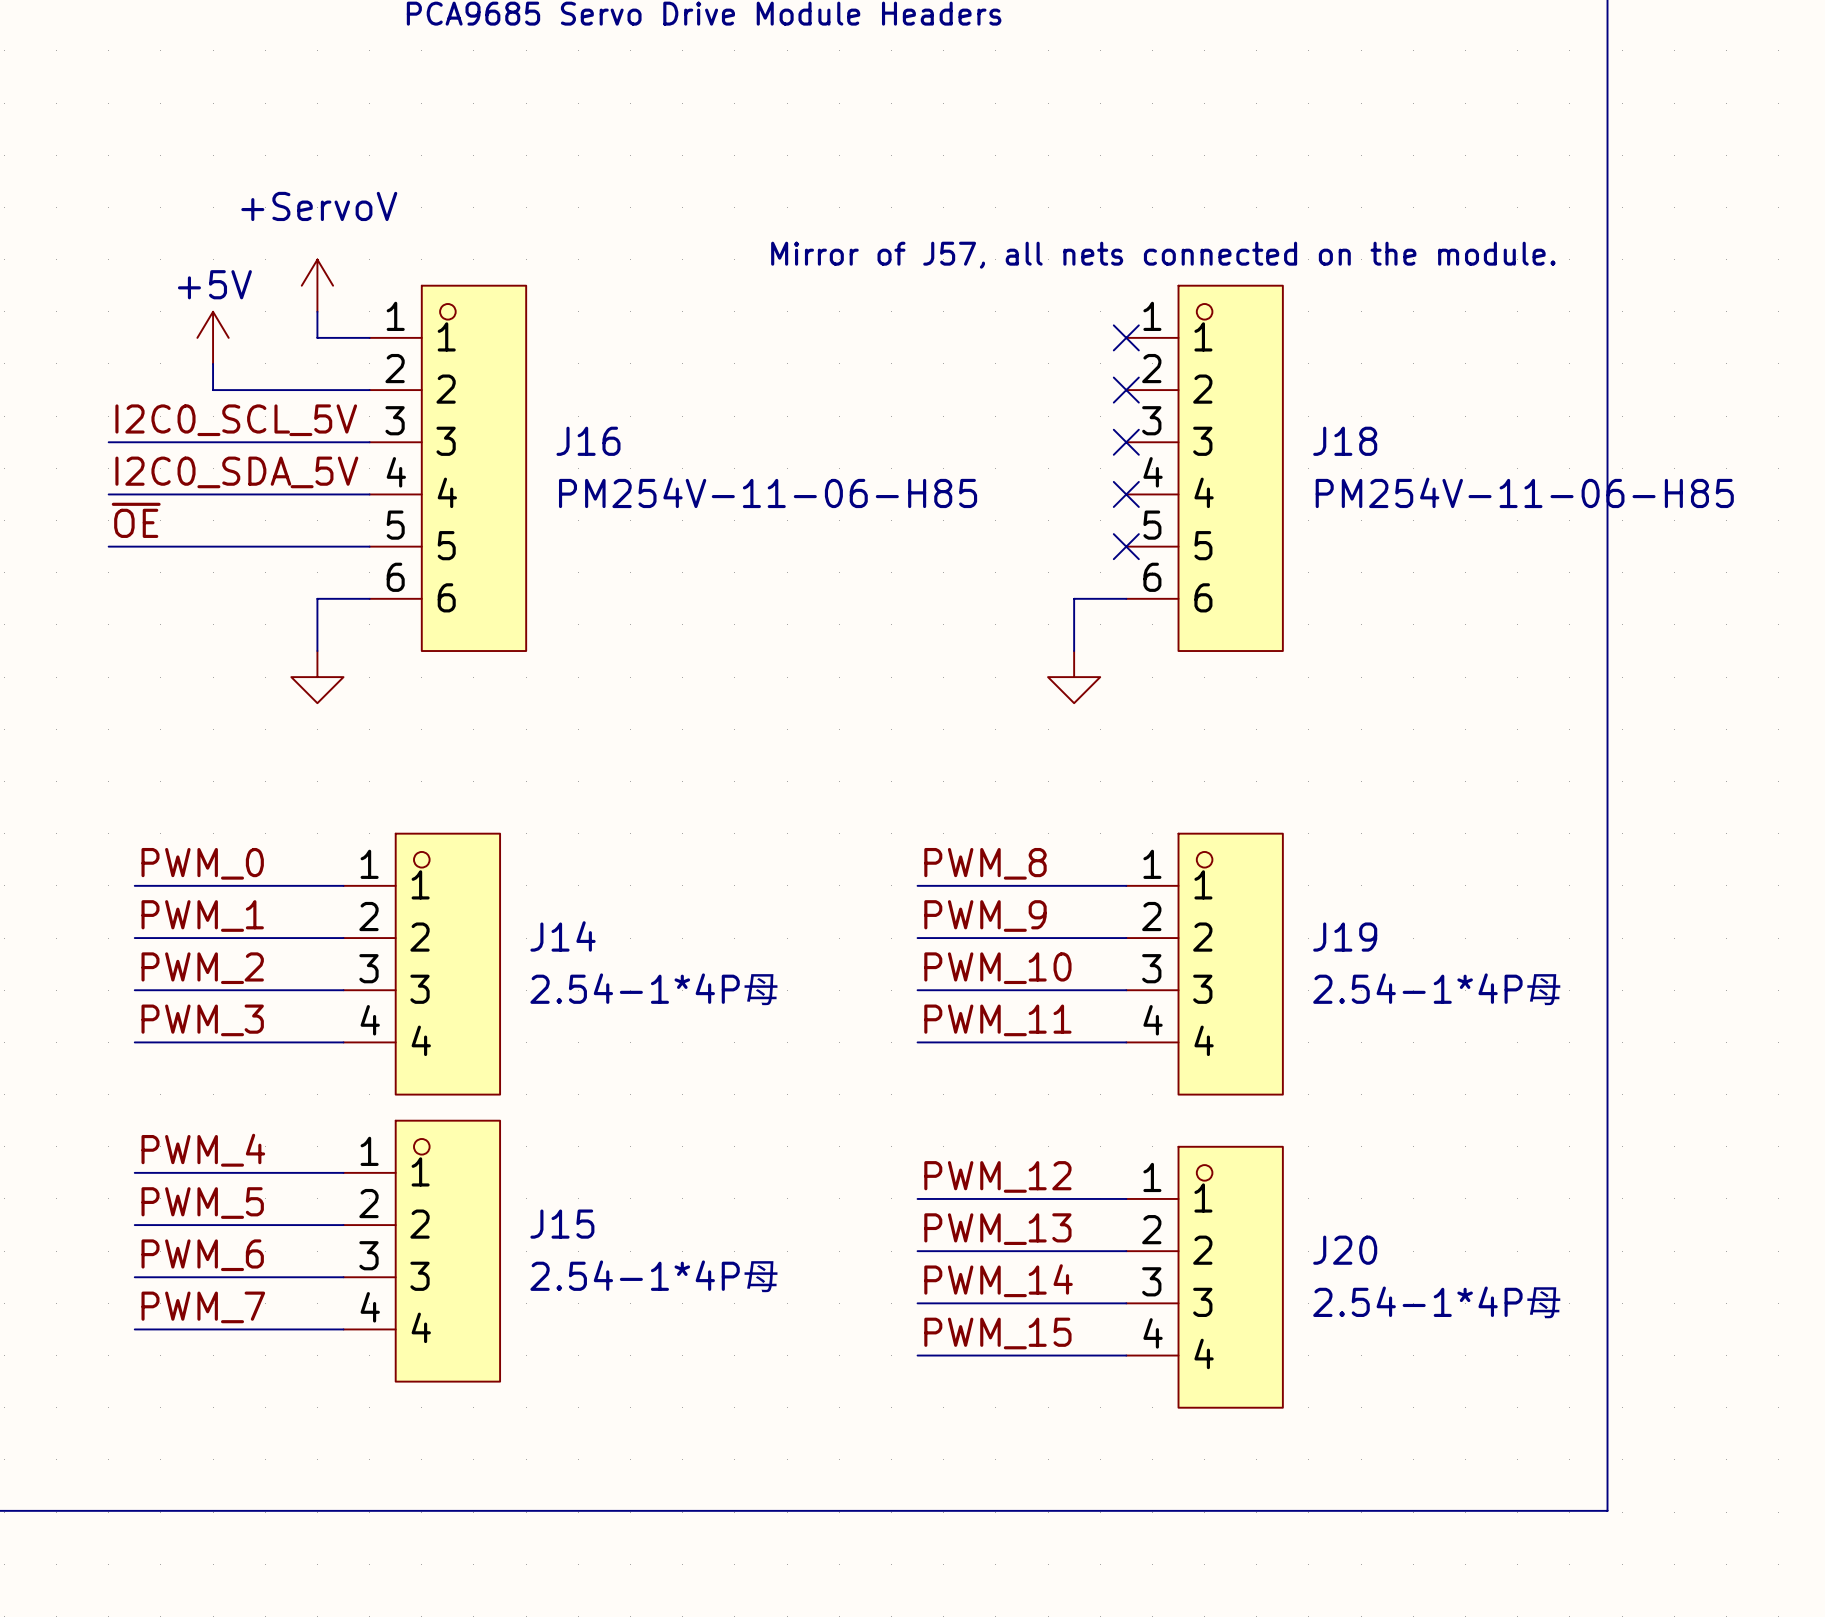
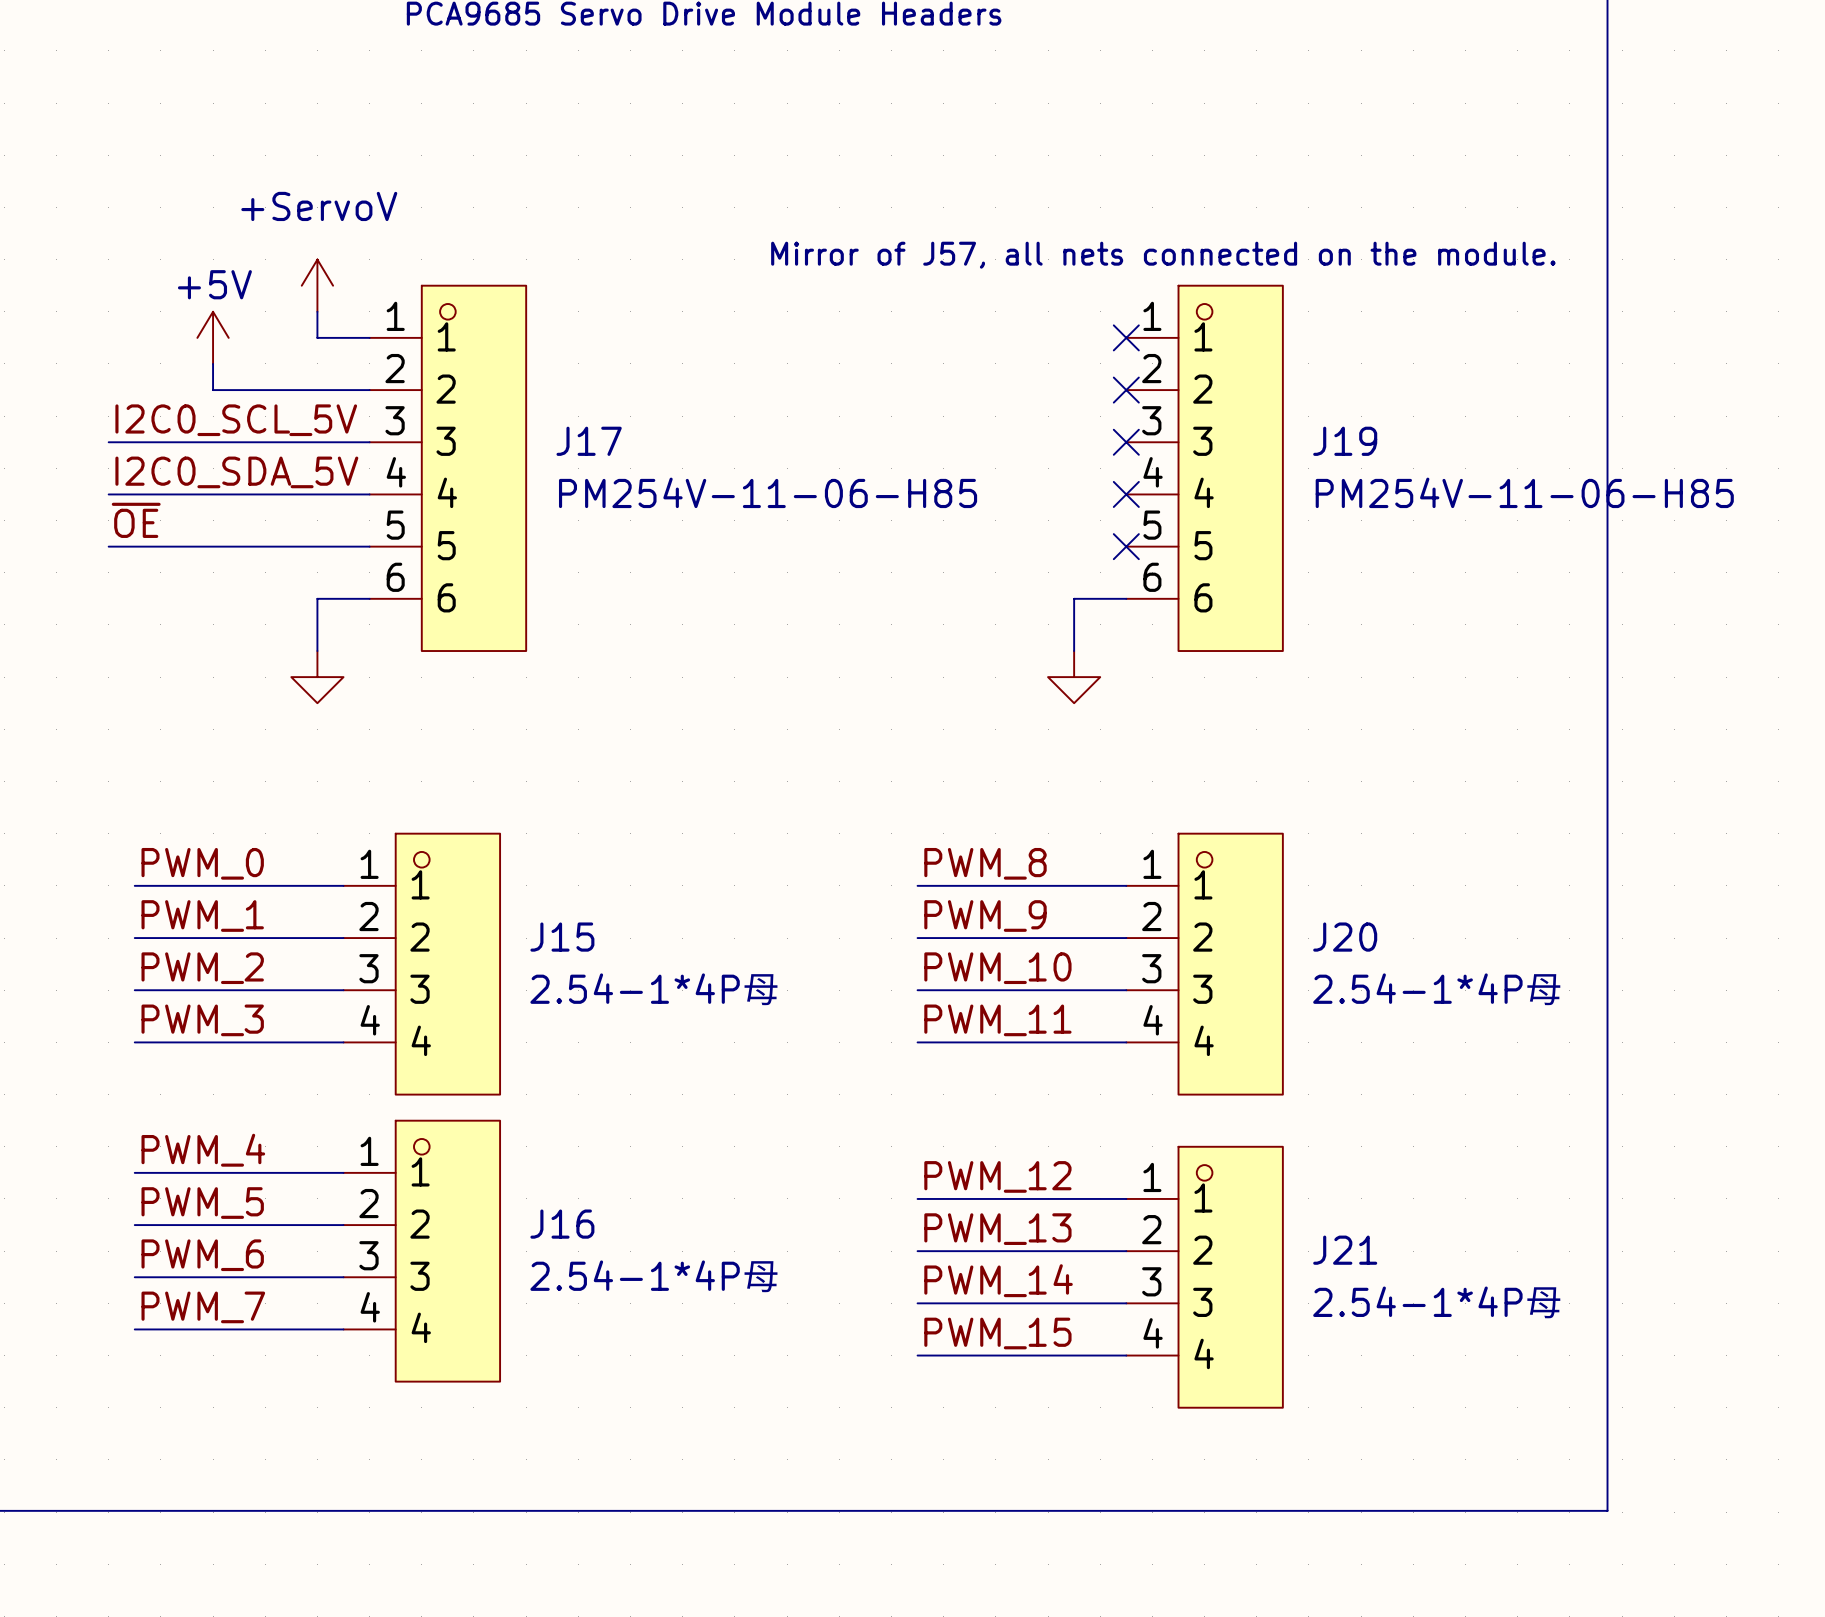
J16 name: J16 (588, 441) -> J17 (589, 441)
J18 name: J18 (1345, 441) -> J19 (1345, 441)
J14 name: J14 (563, 936) -> J15 (562, 937)
J19 name: J19 (1345, 937) -> J20 (1345, 937)
J15 name: J15 (562, 1224) -> J16 (562, 1224)
J20 name: J20 (1345, 1250) -> J21 (1345, 1250)

